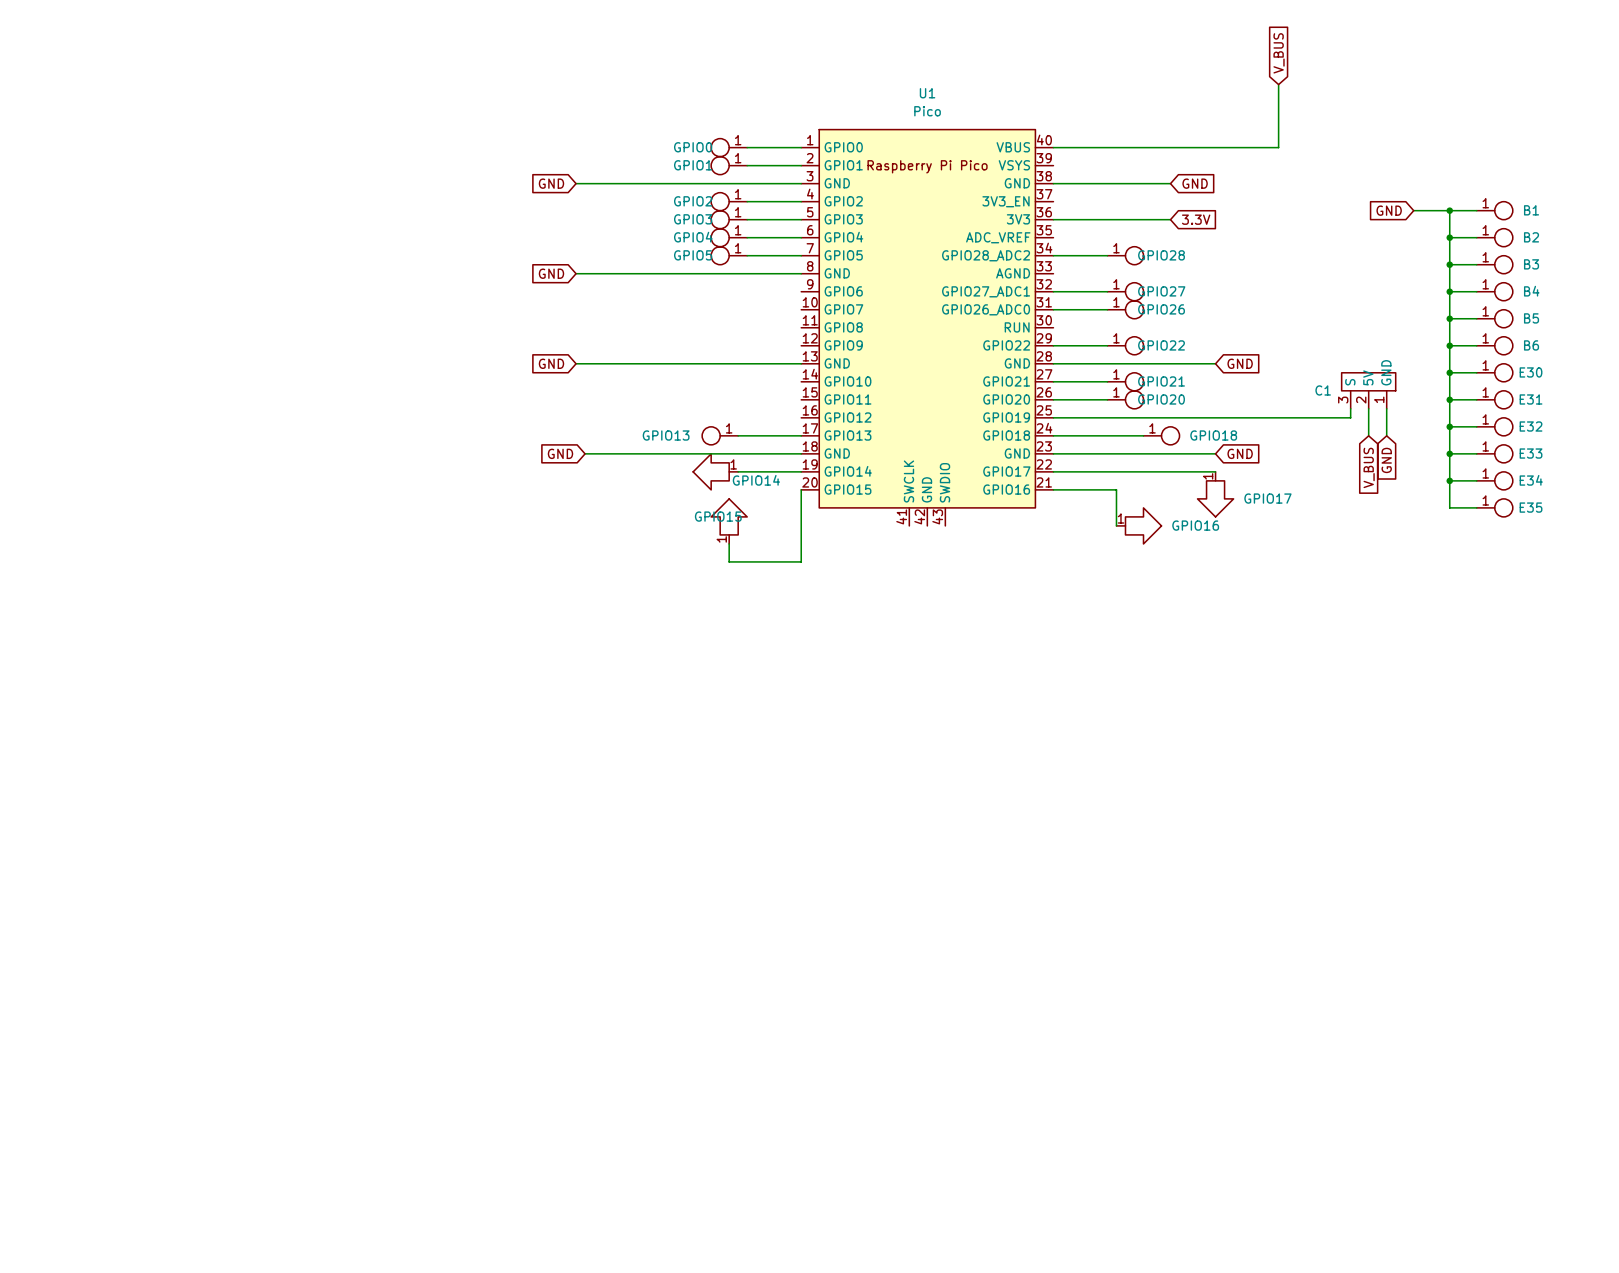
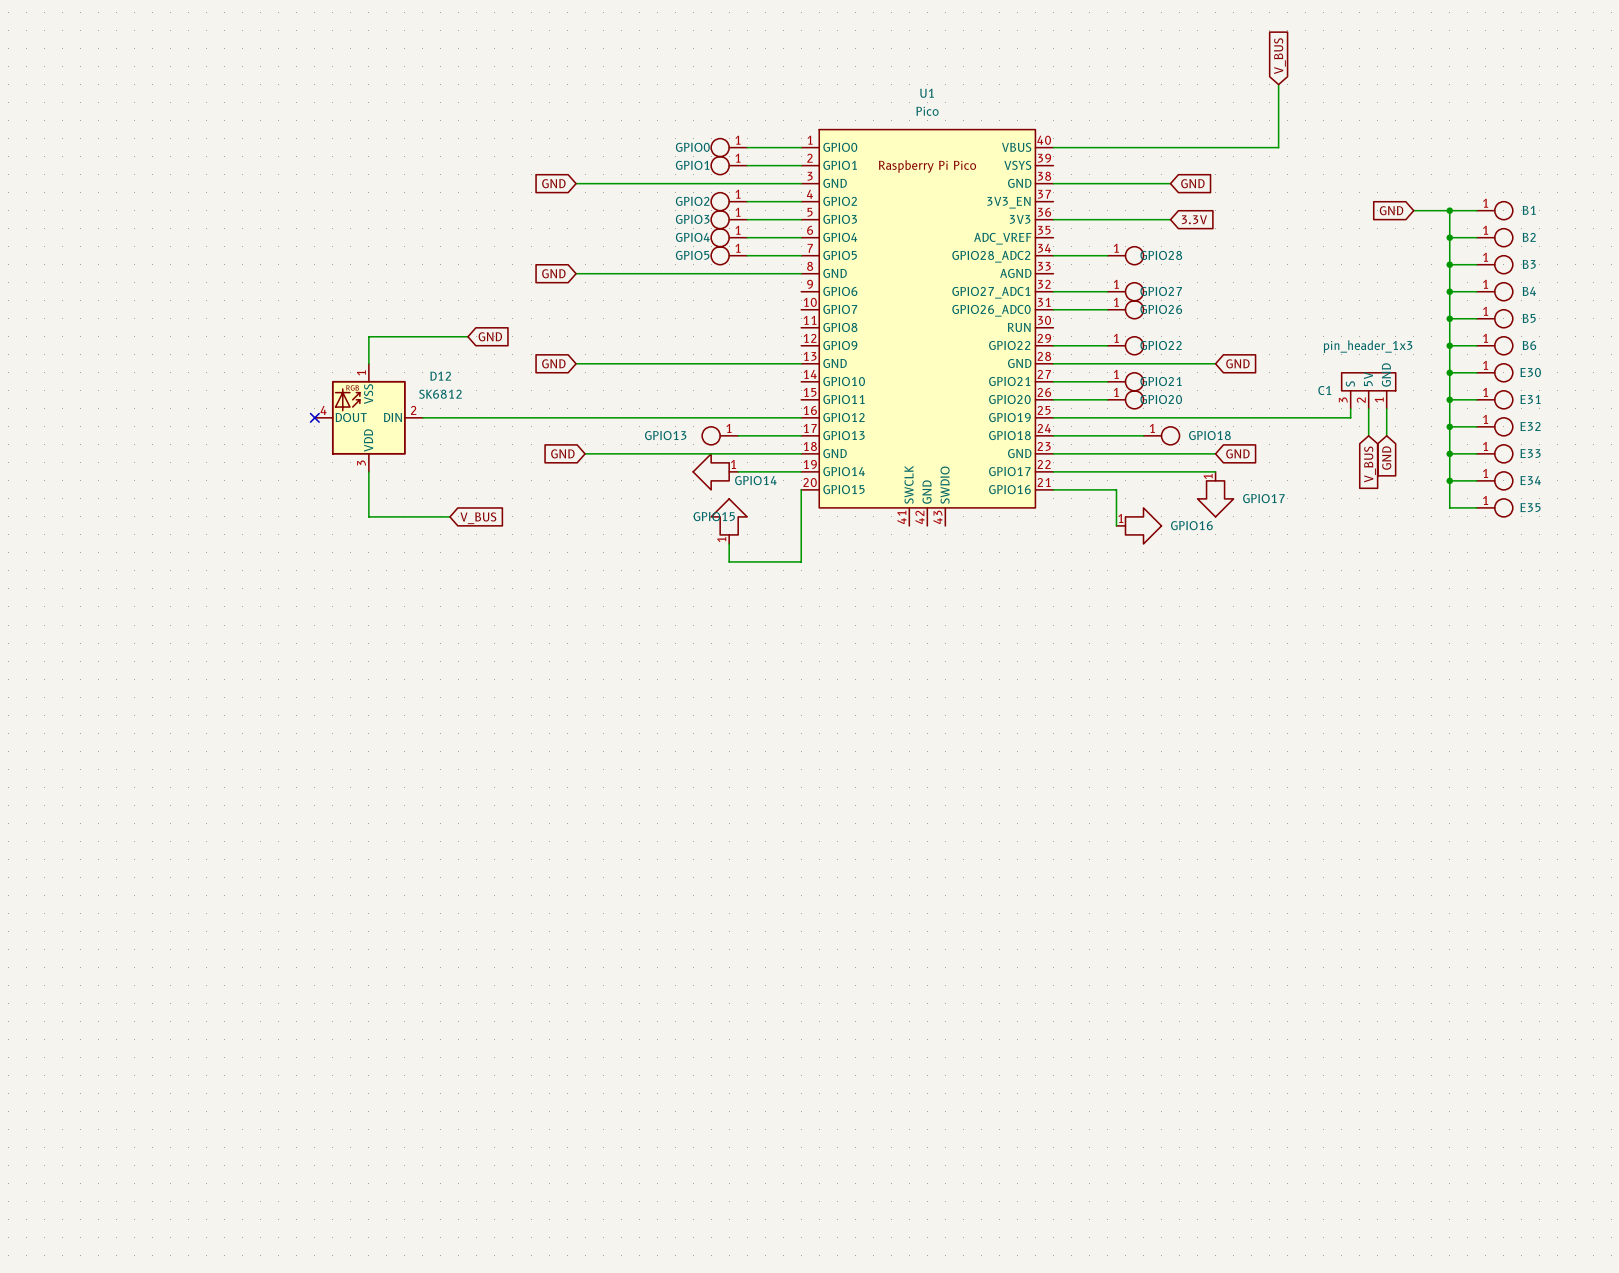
wire: none -> (467, 336) (368, 336) (368, 363)
global label: none -> GND (490, 336)
C1 value: none -> pin_header_1x3 (1368, 346)
no-connect mark: none -> (314, 417)
D12: none -> SK6812 (368, 417)
wire: none -> (422, 417) (801, 417)
wire: none -> (368, 471) (368, 516) (449, 516)
global label: none -> V_BUS (478, 518)

